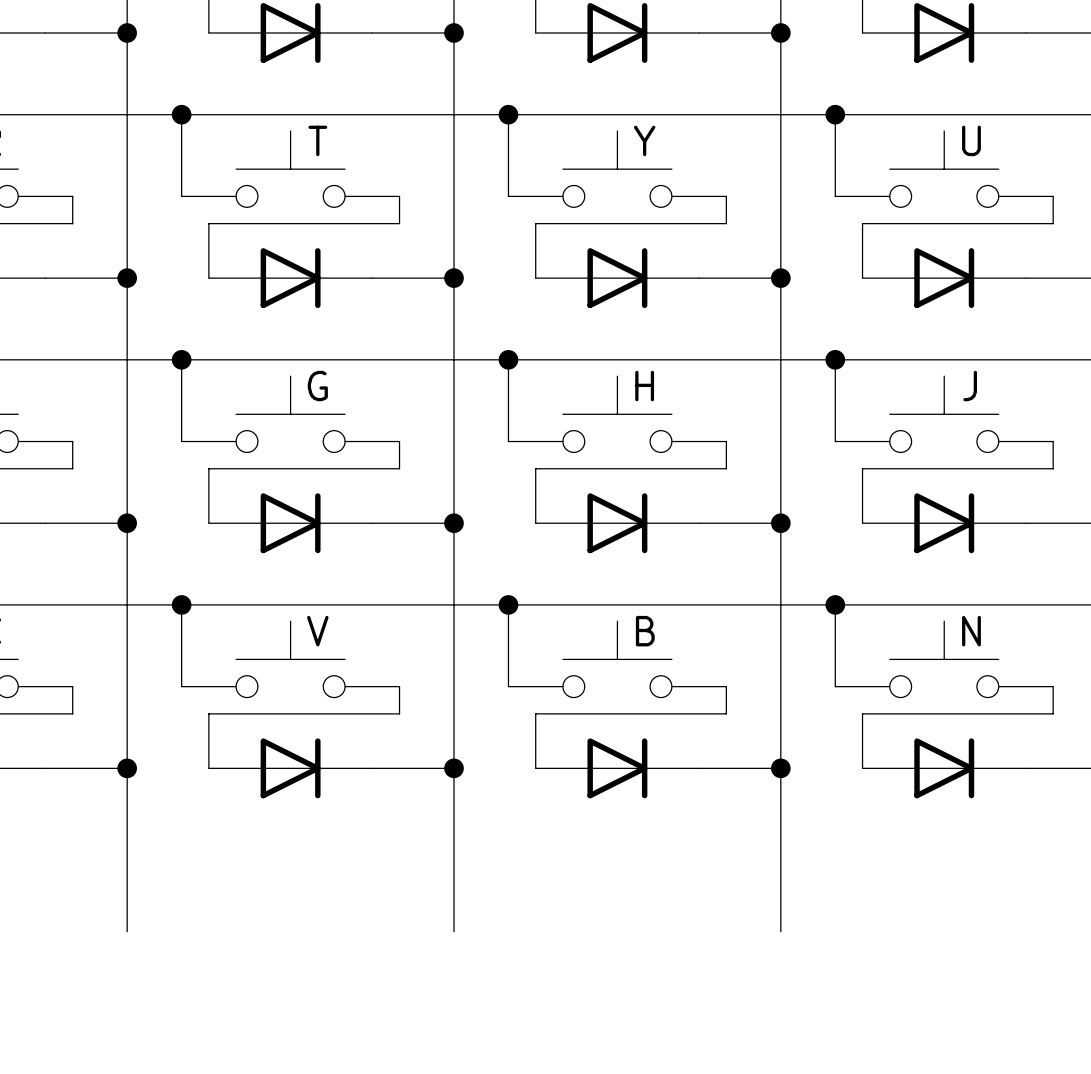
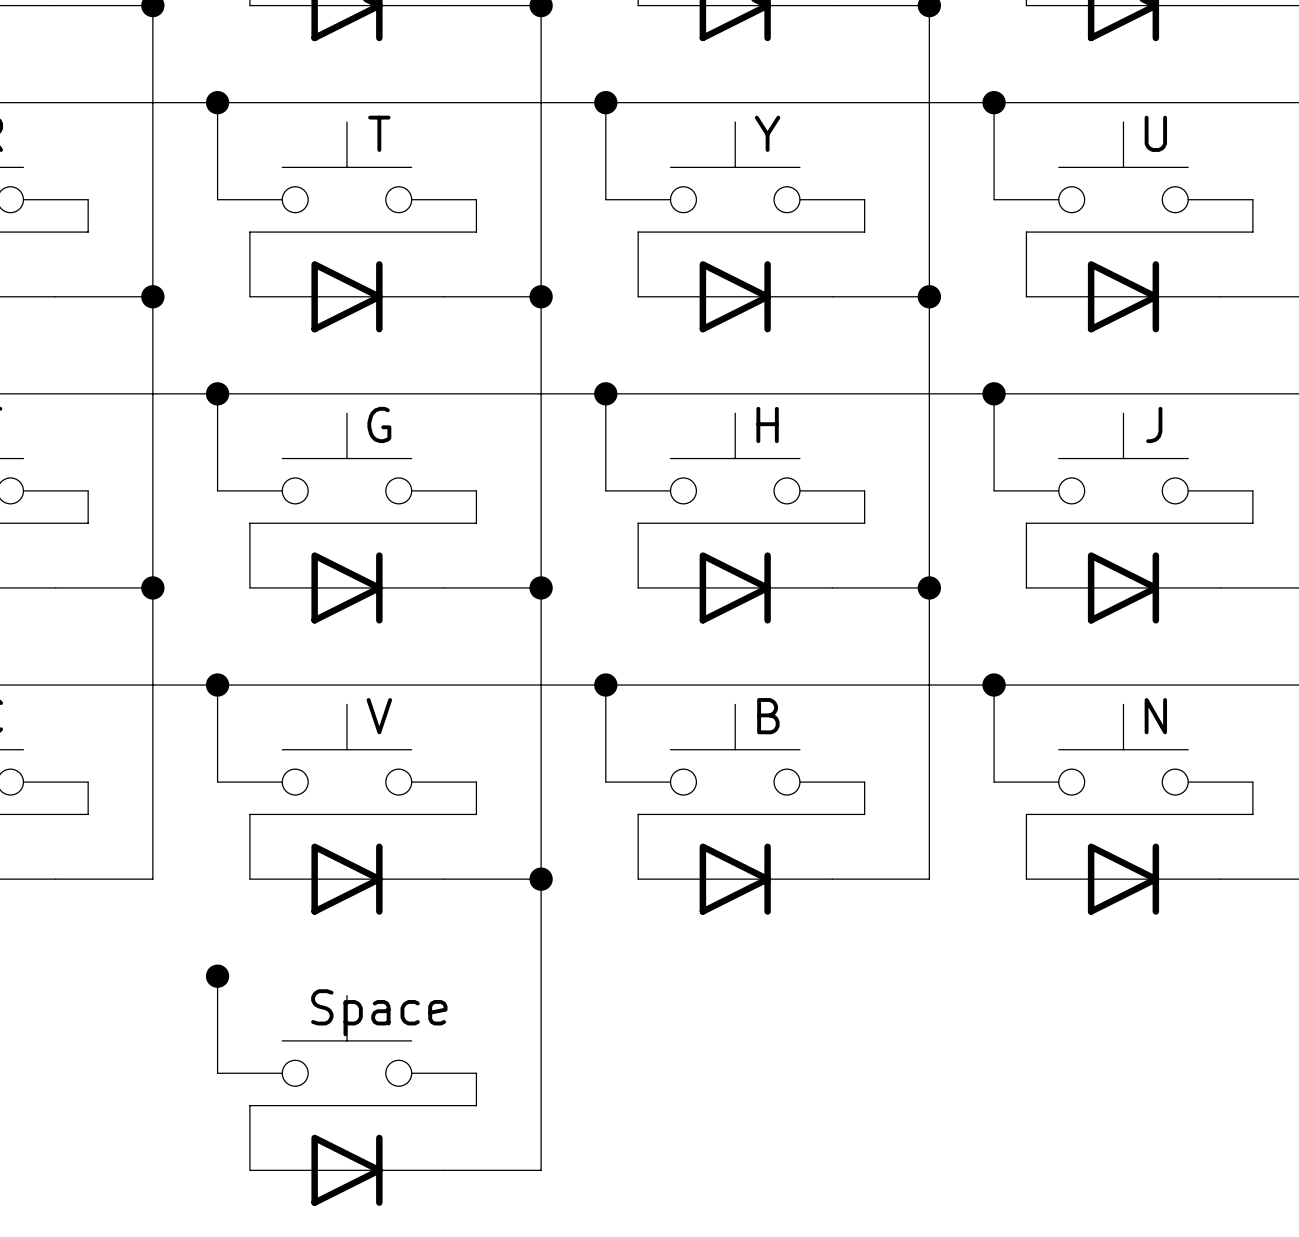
wire: (127, 768) (127, 931) -> none
junction position: (127, 768) -> (217, 976)
wire: (780, 768) (780, 931) -> none
junction: (780, 768) -> none
wire: none -> (217, 976) (217, 1073)
part: none -> Space (346, 1040)
wire: none -> (476, 1073) (476, 1105) (249, 1105) (249, 1170)
wire: none -> (541, 1073) (541, 1170) (444, 1170)
part: none -> (346, 1170)

